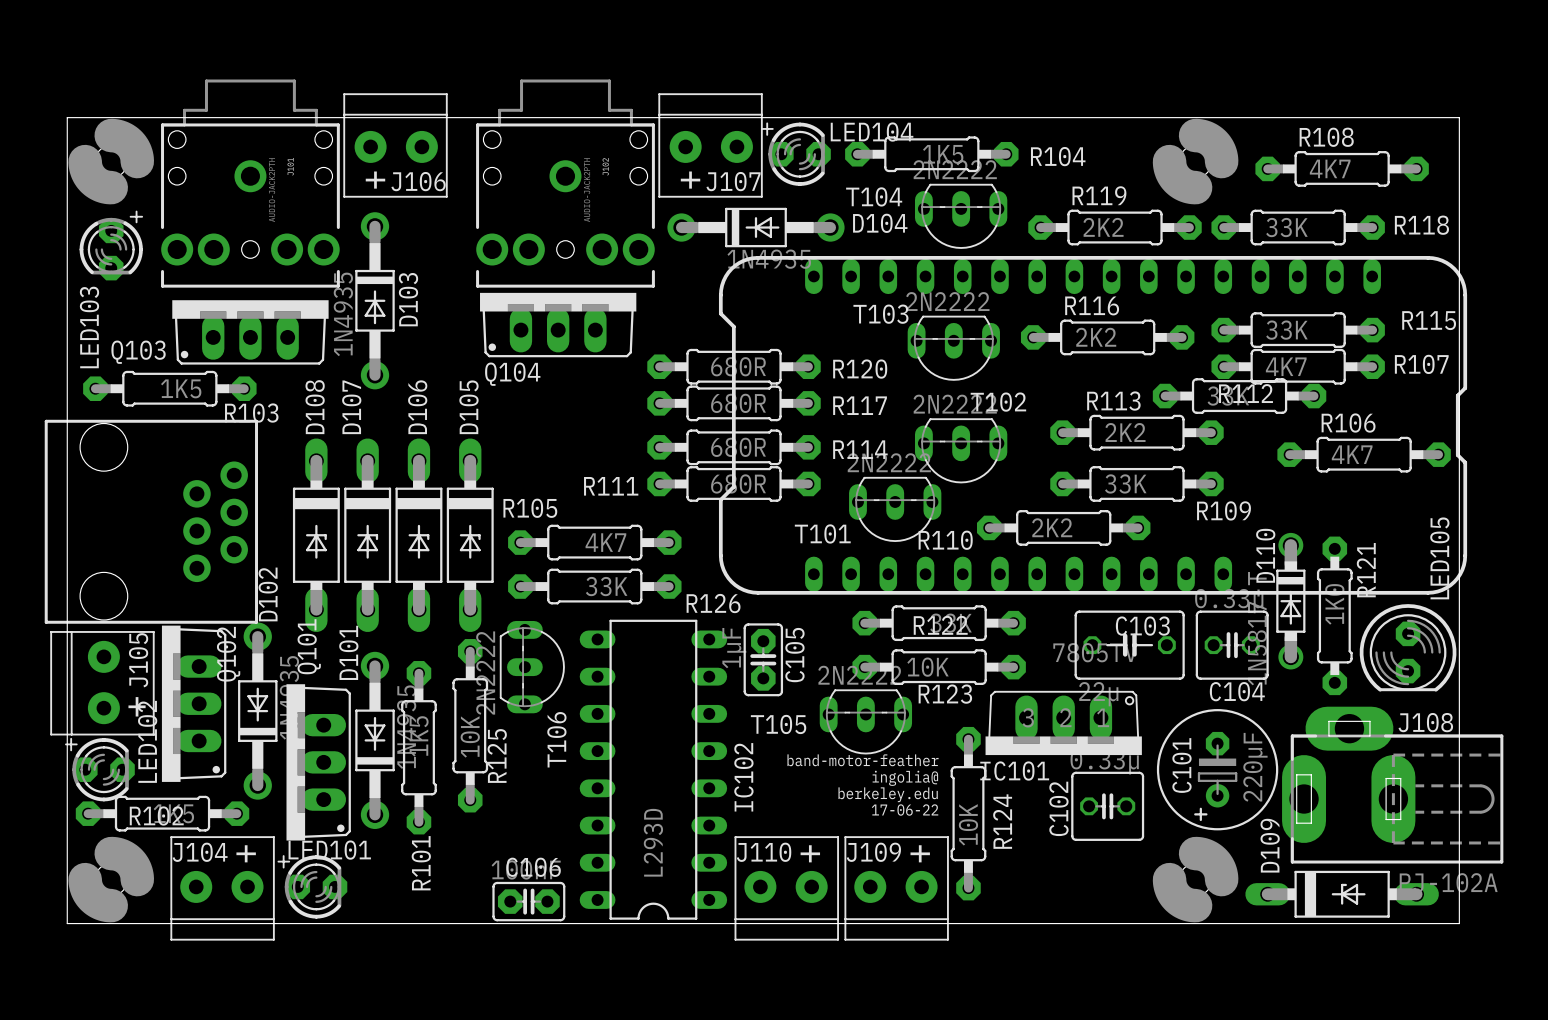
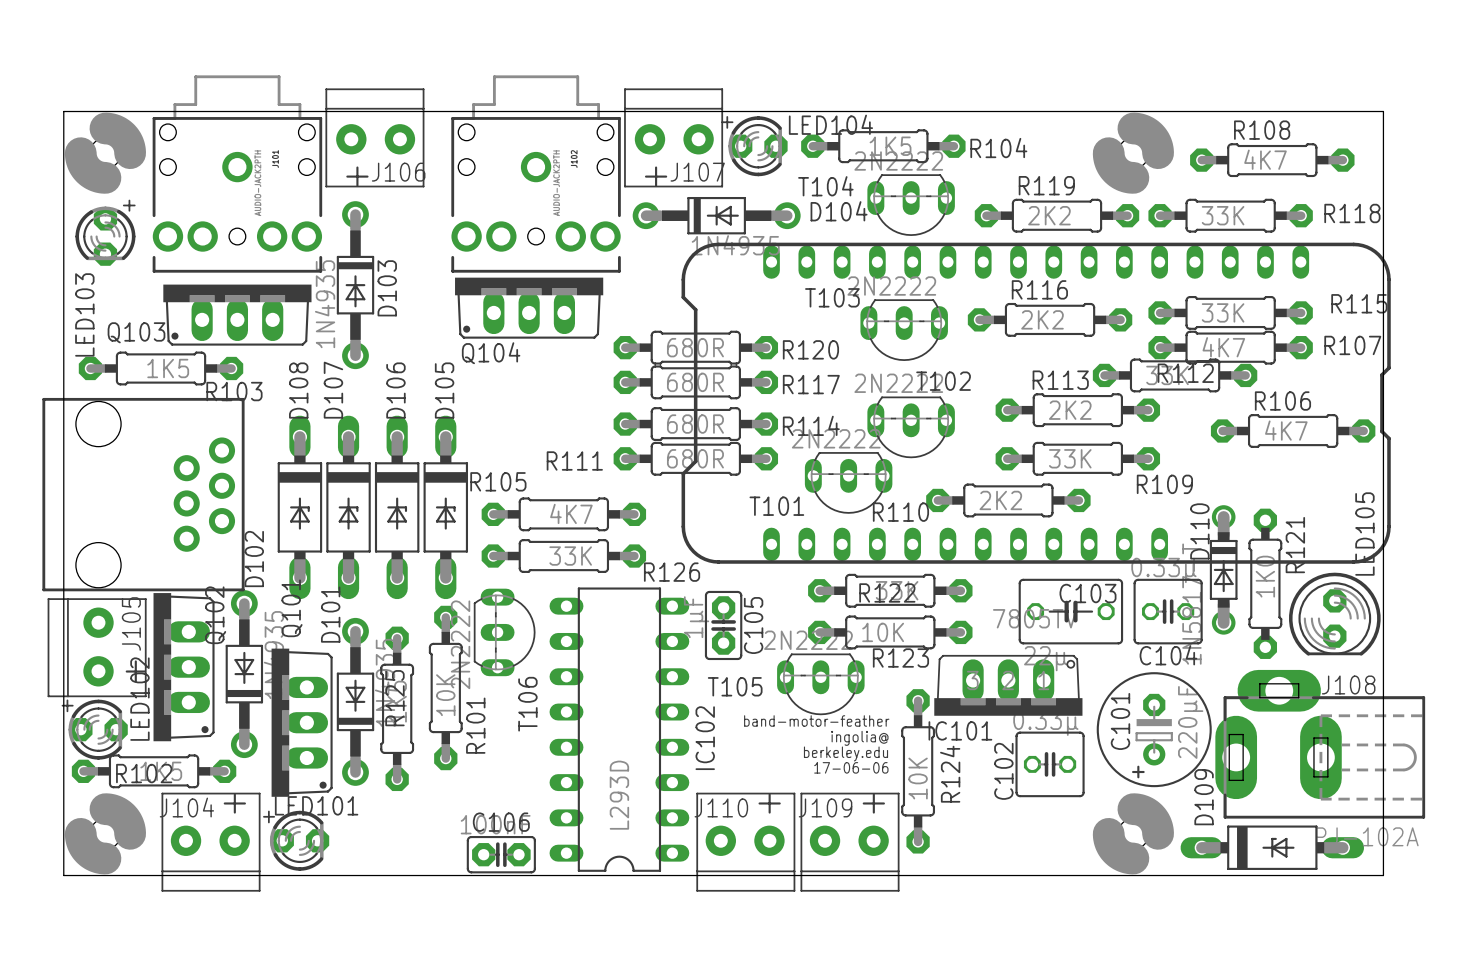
R125 name position: R125 (497, 755) -> R125 (394, 698)
text: 17-06-22 (905, 810) -> 17-06-06 (851, 767)
R101 name position: R101 (421, 863) -> R101 (475, 725)

